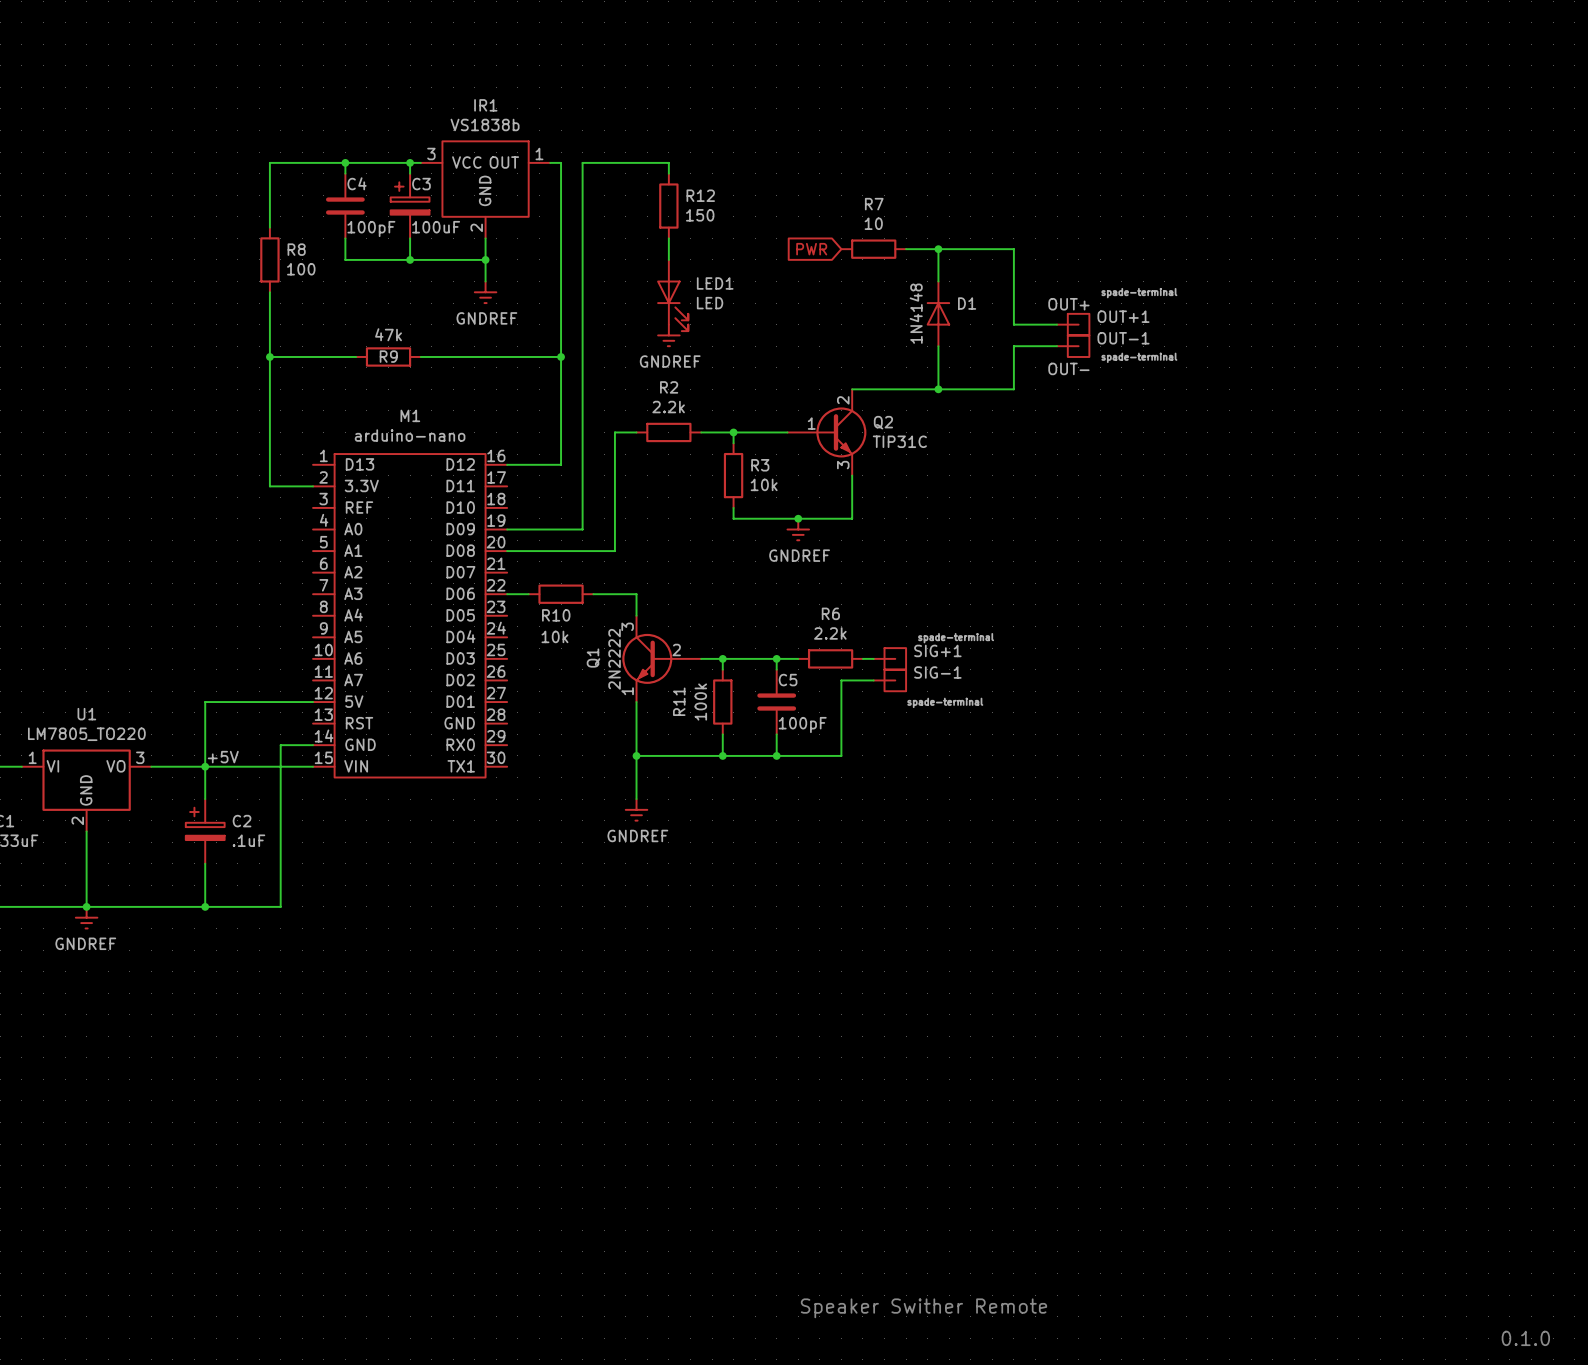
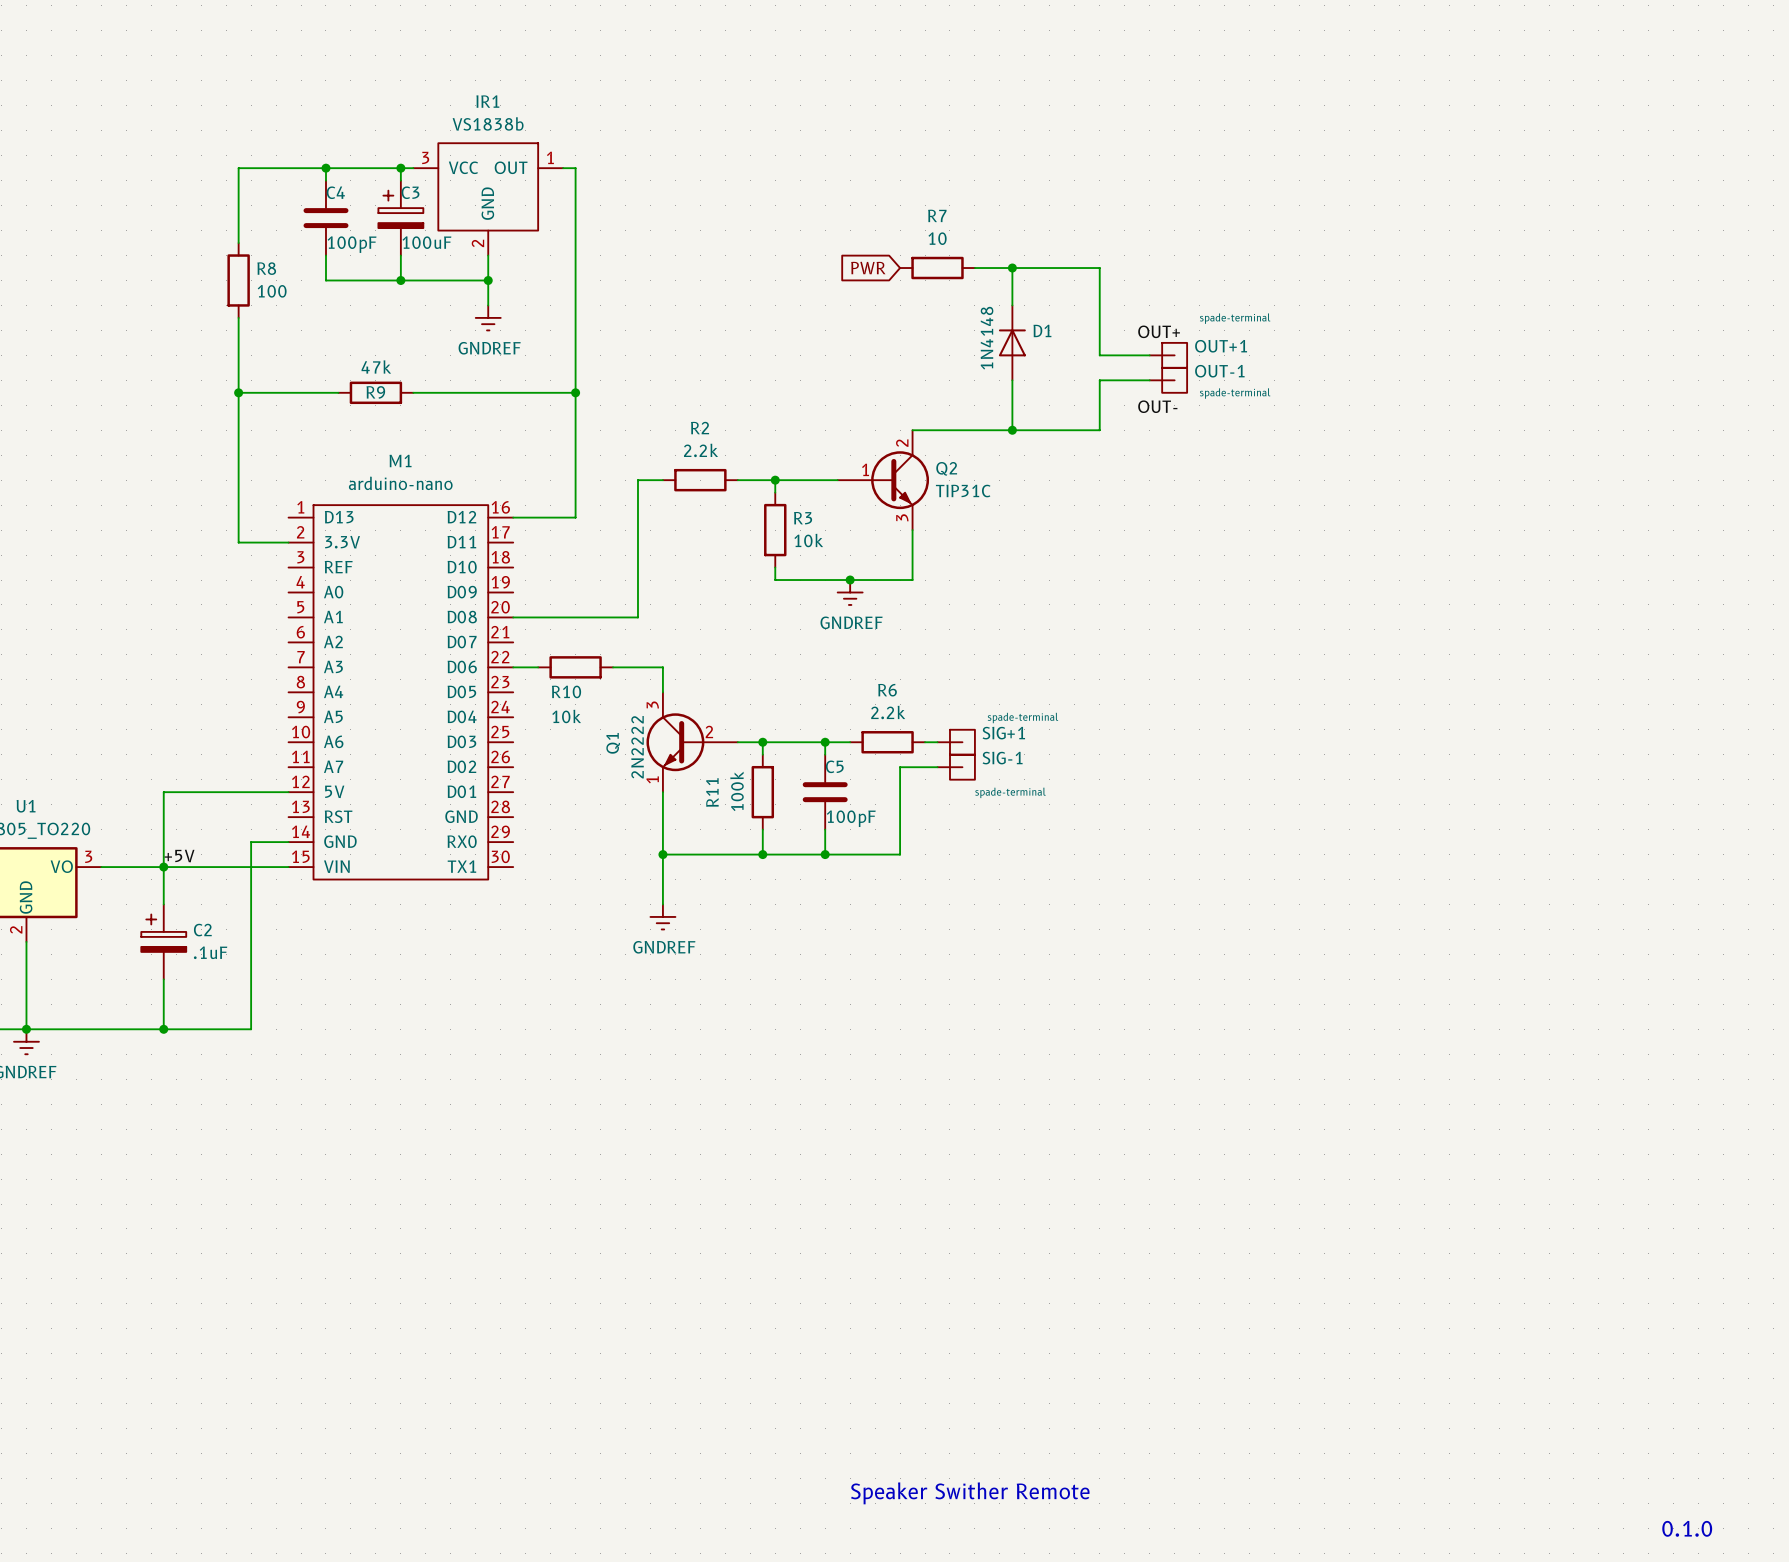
wire: (668, 173) (668, 162) (582, 162) (582, 529) (507, 529) -> none
R12: 150 (668, 206) -> none
wire: (668, 238) (668, 259) -> none
LED1: LED (672, 295) -> none
power symbol: GNDREF (668, 335) -> none

